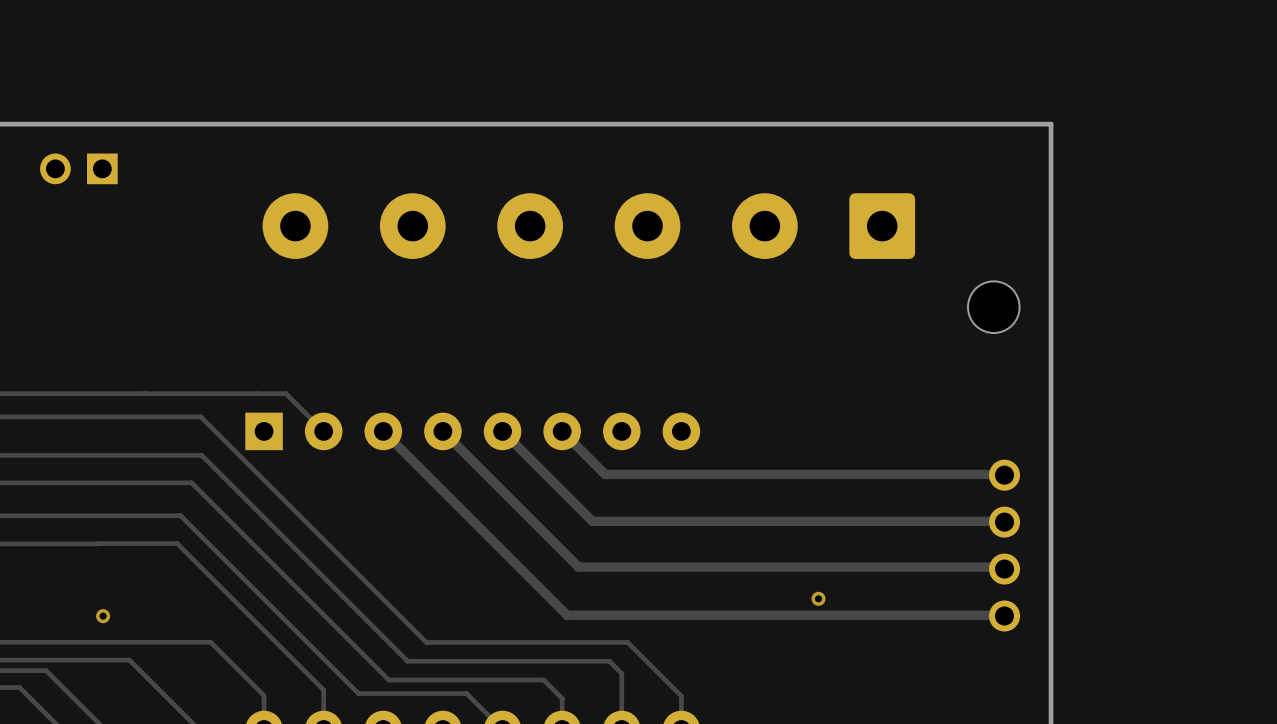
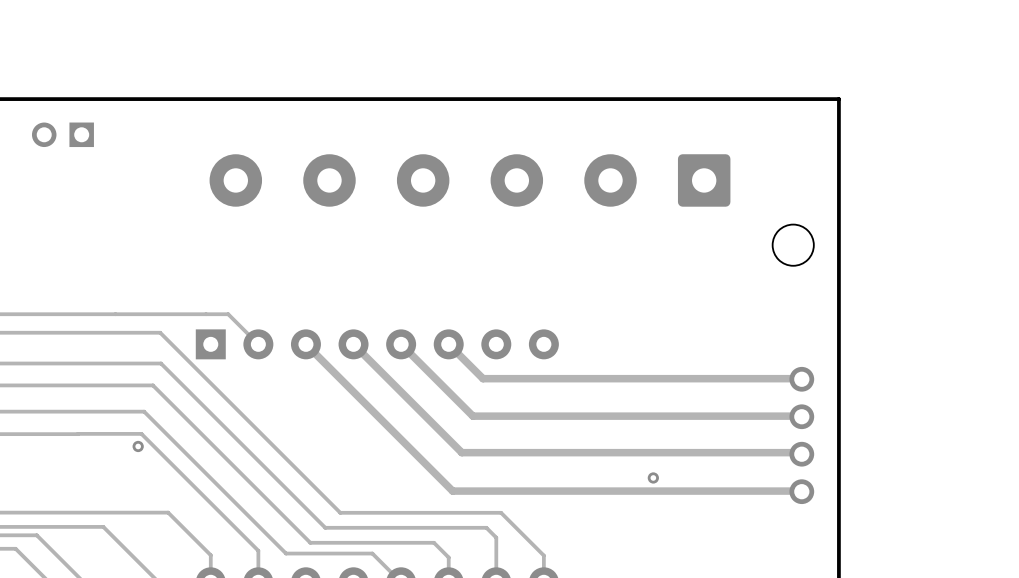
via: none -> (138, 446)
via: (103, 616) -> none

